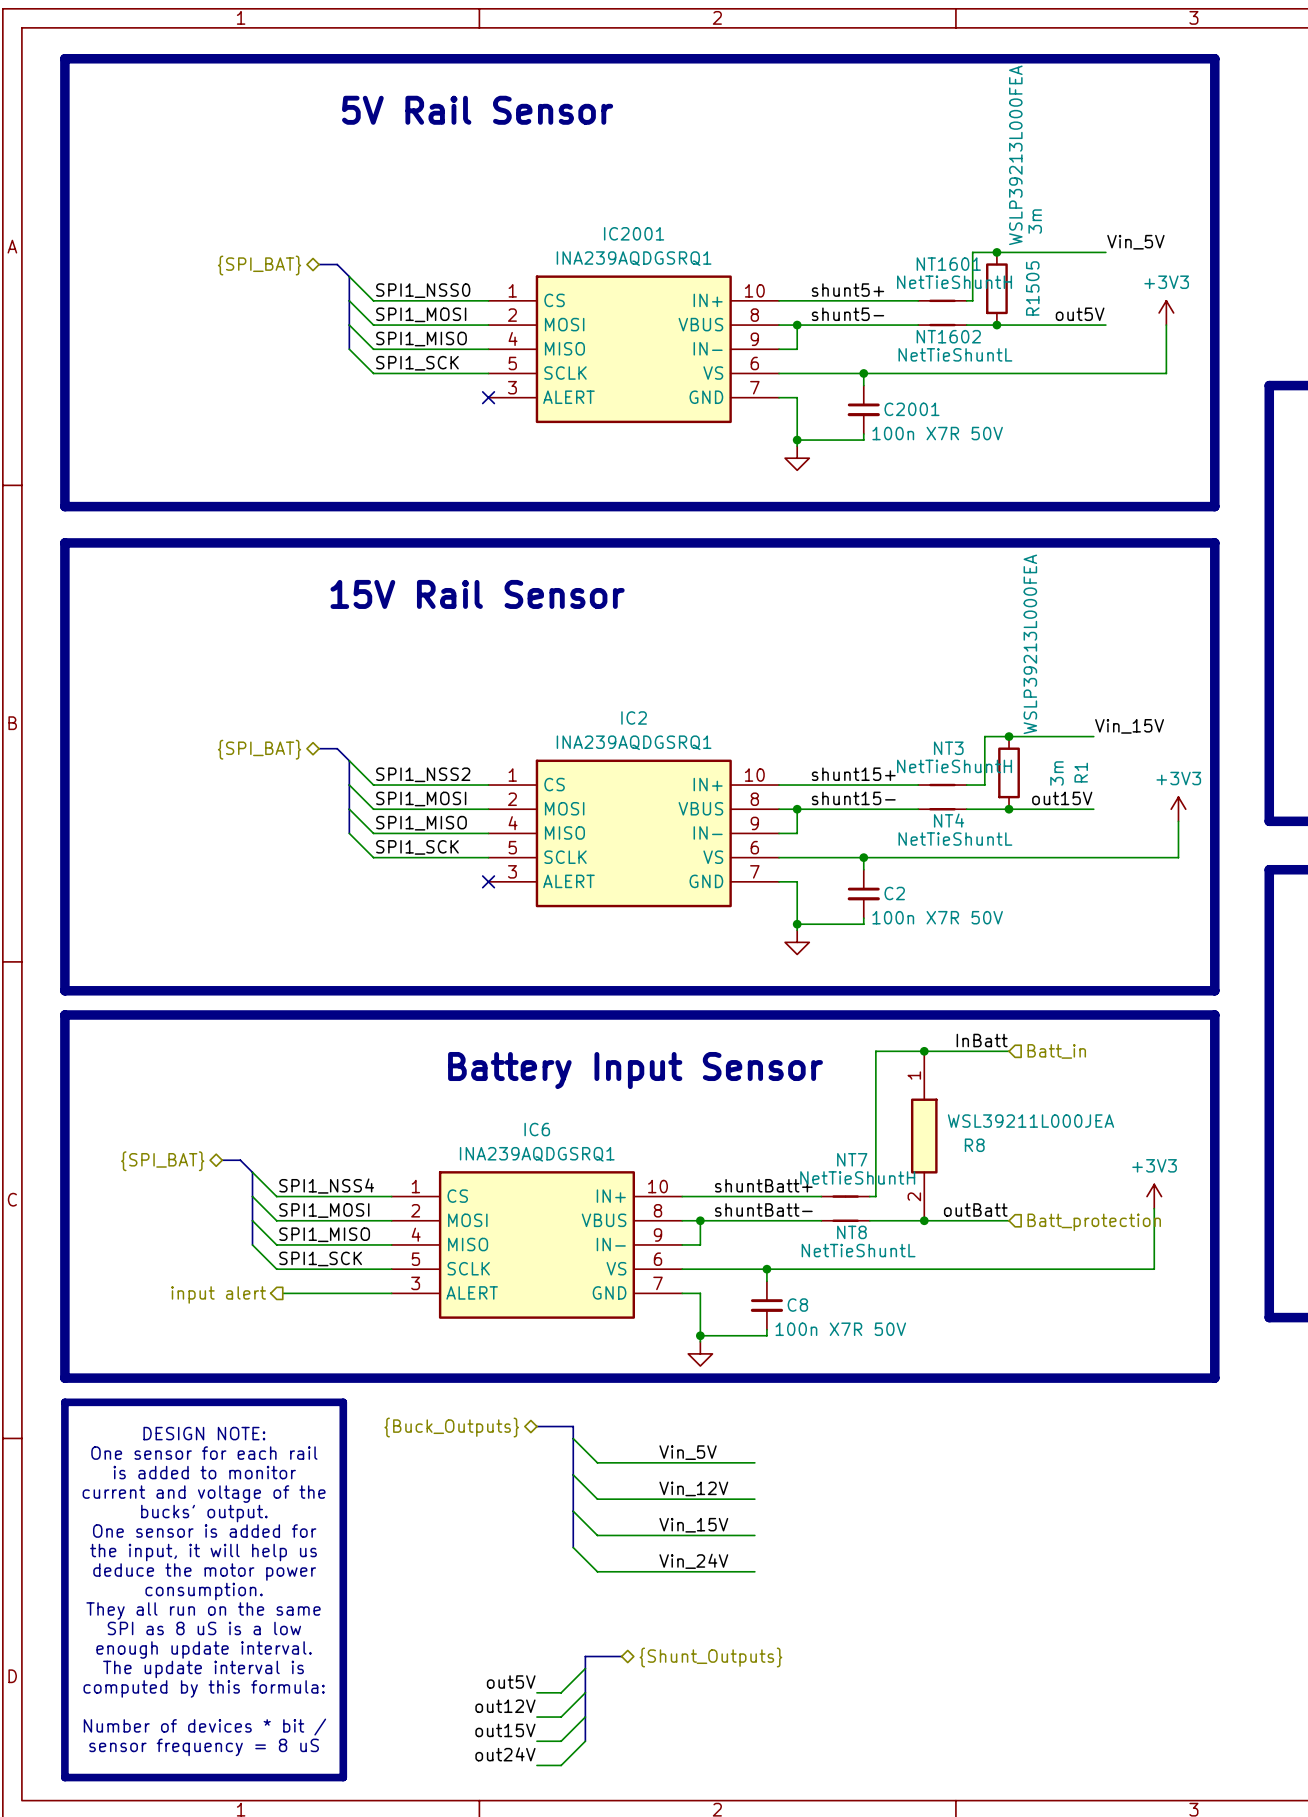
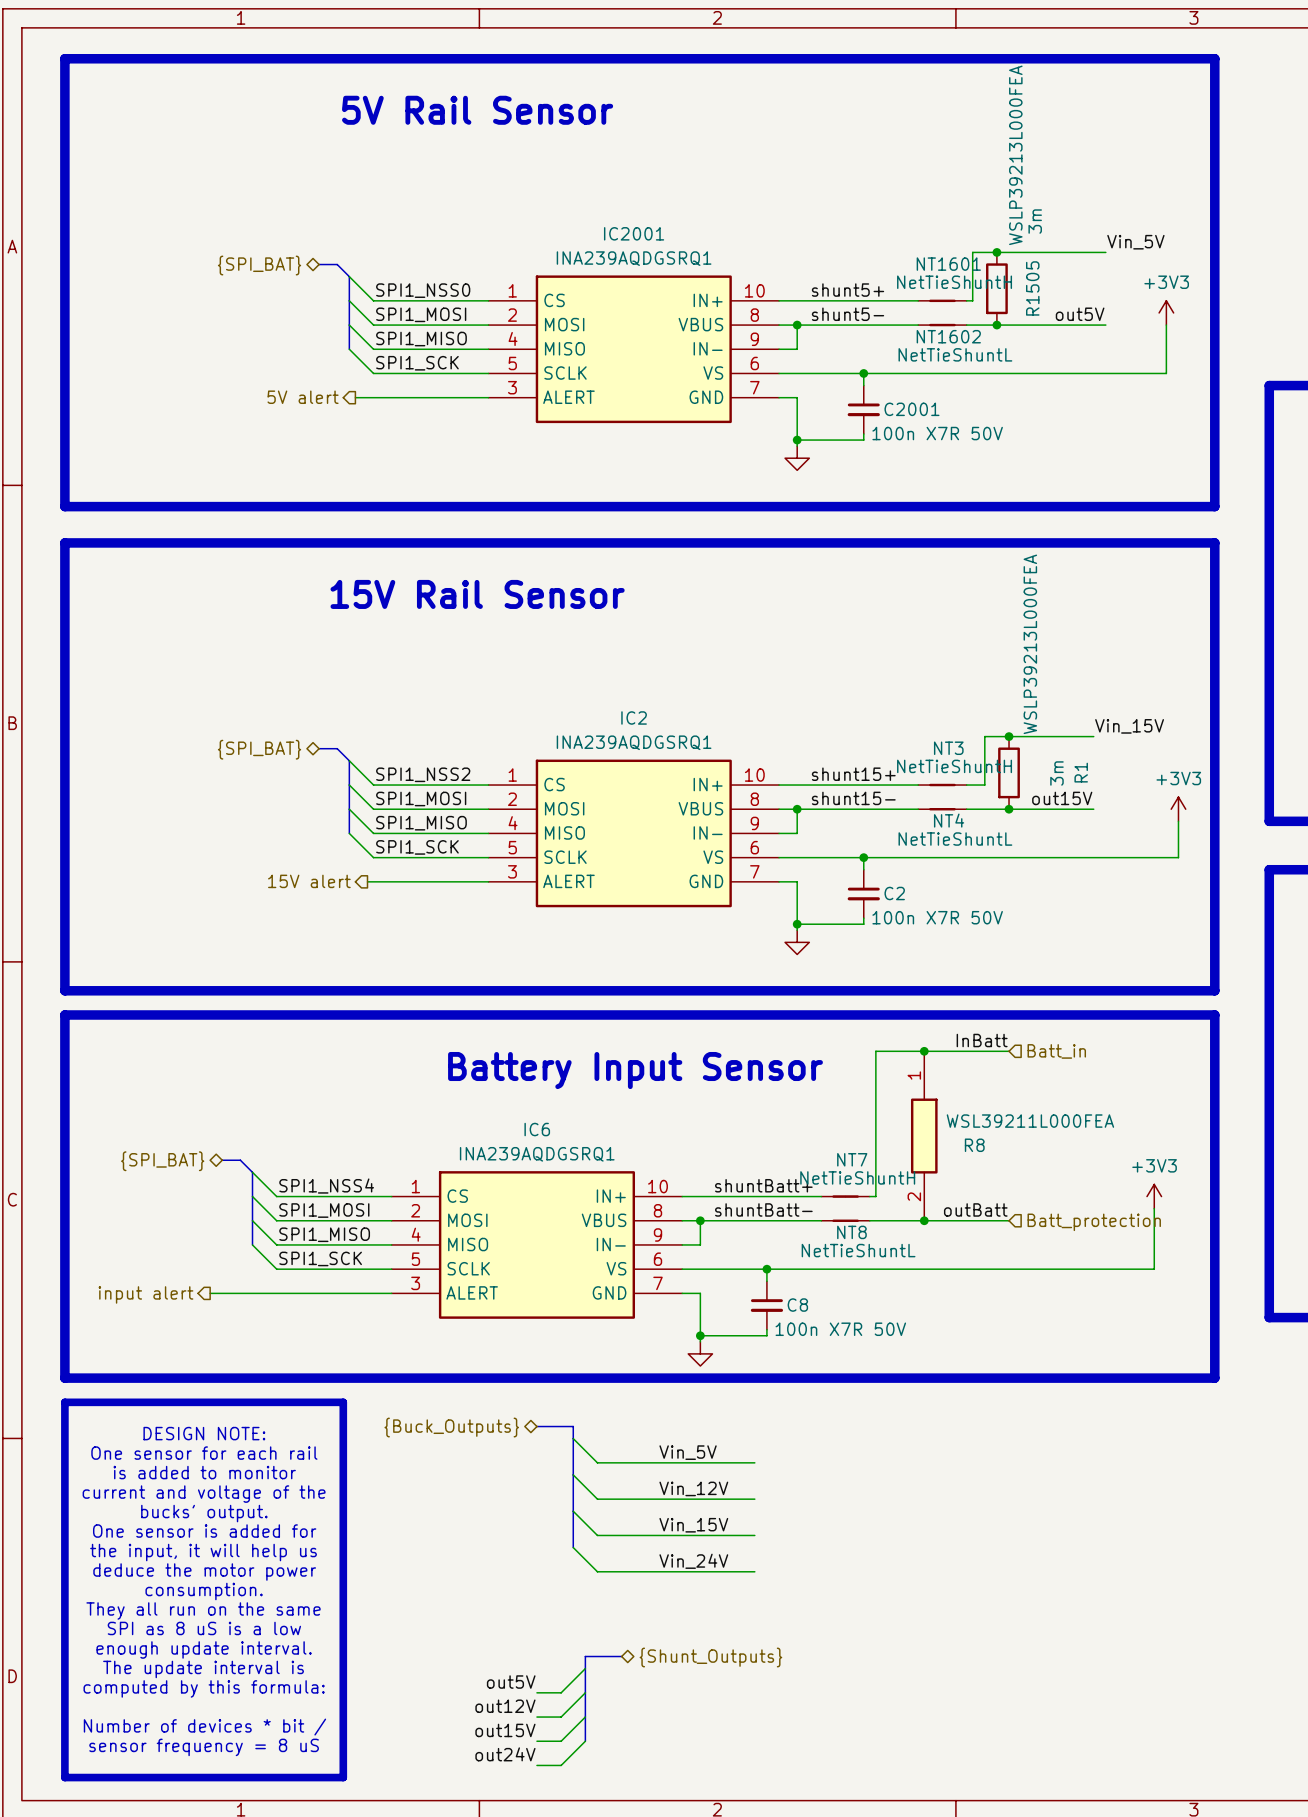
hierarchical label: none -> 5V alert (303, 397)
wire: none -> (355, 397) (488, 397)
no-connect mark: (488, 397) -> none
hierarchical label: none -> 15V alert (309, 881)
wire: none -> (367, 881) (488, 881)
no-connect mark: (488, 881) -> none
R8 value: WSL39211L000JEA (1031, 1121) -> WSL39211L000FEA (1030, 1121)
wire: none -> (210, 1293) (282, 1293)
hierarchical label position: input alert (218, 1294) -> input alert (145, 1294)

